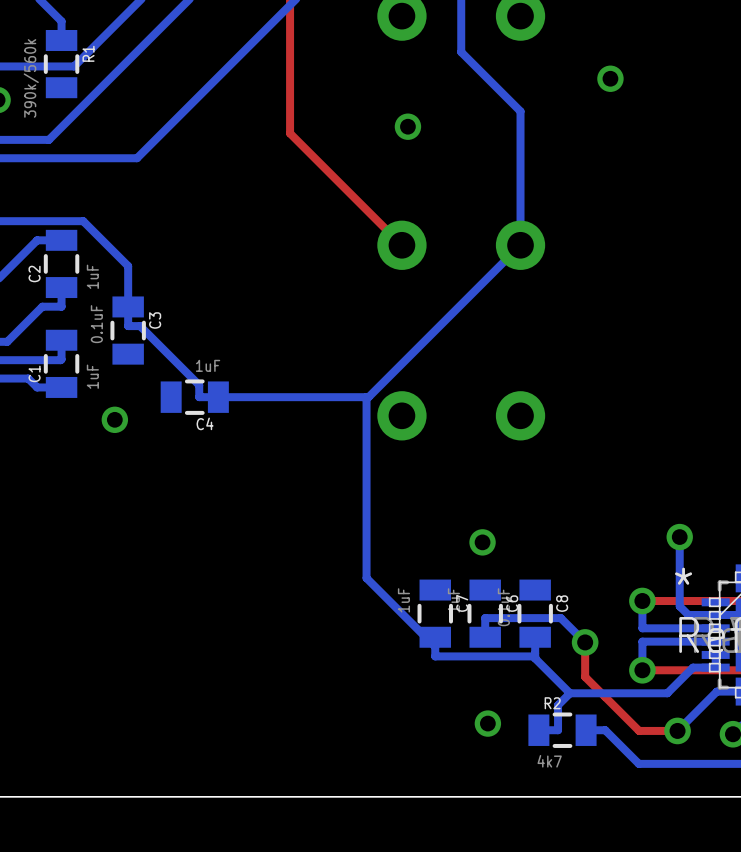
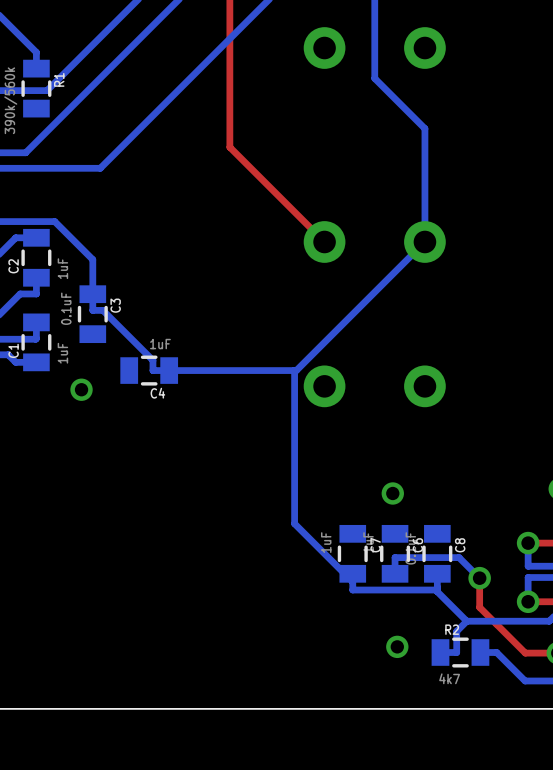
via: (610, 78) -> none
via: (407, 126) -> none

